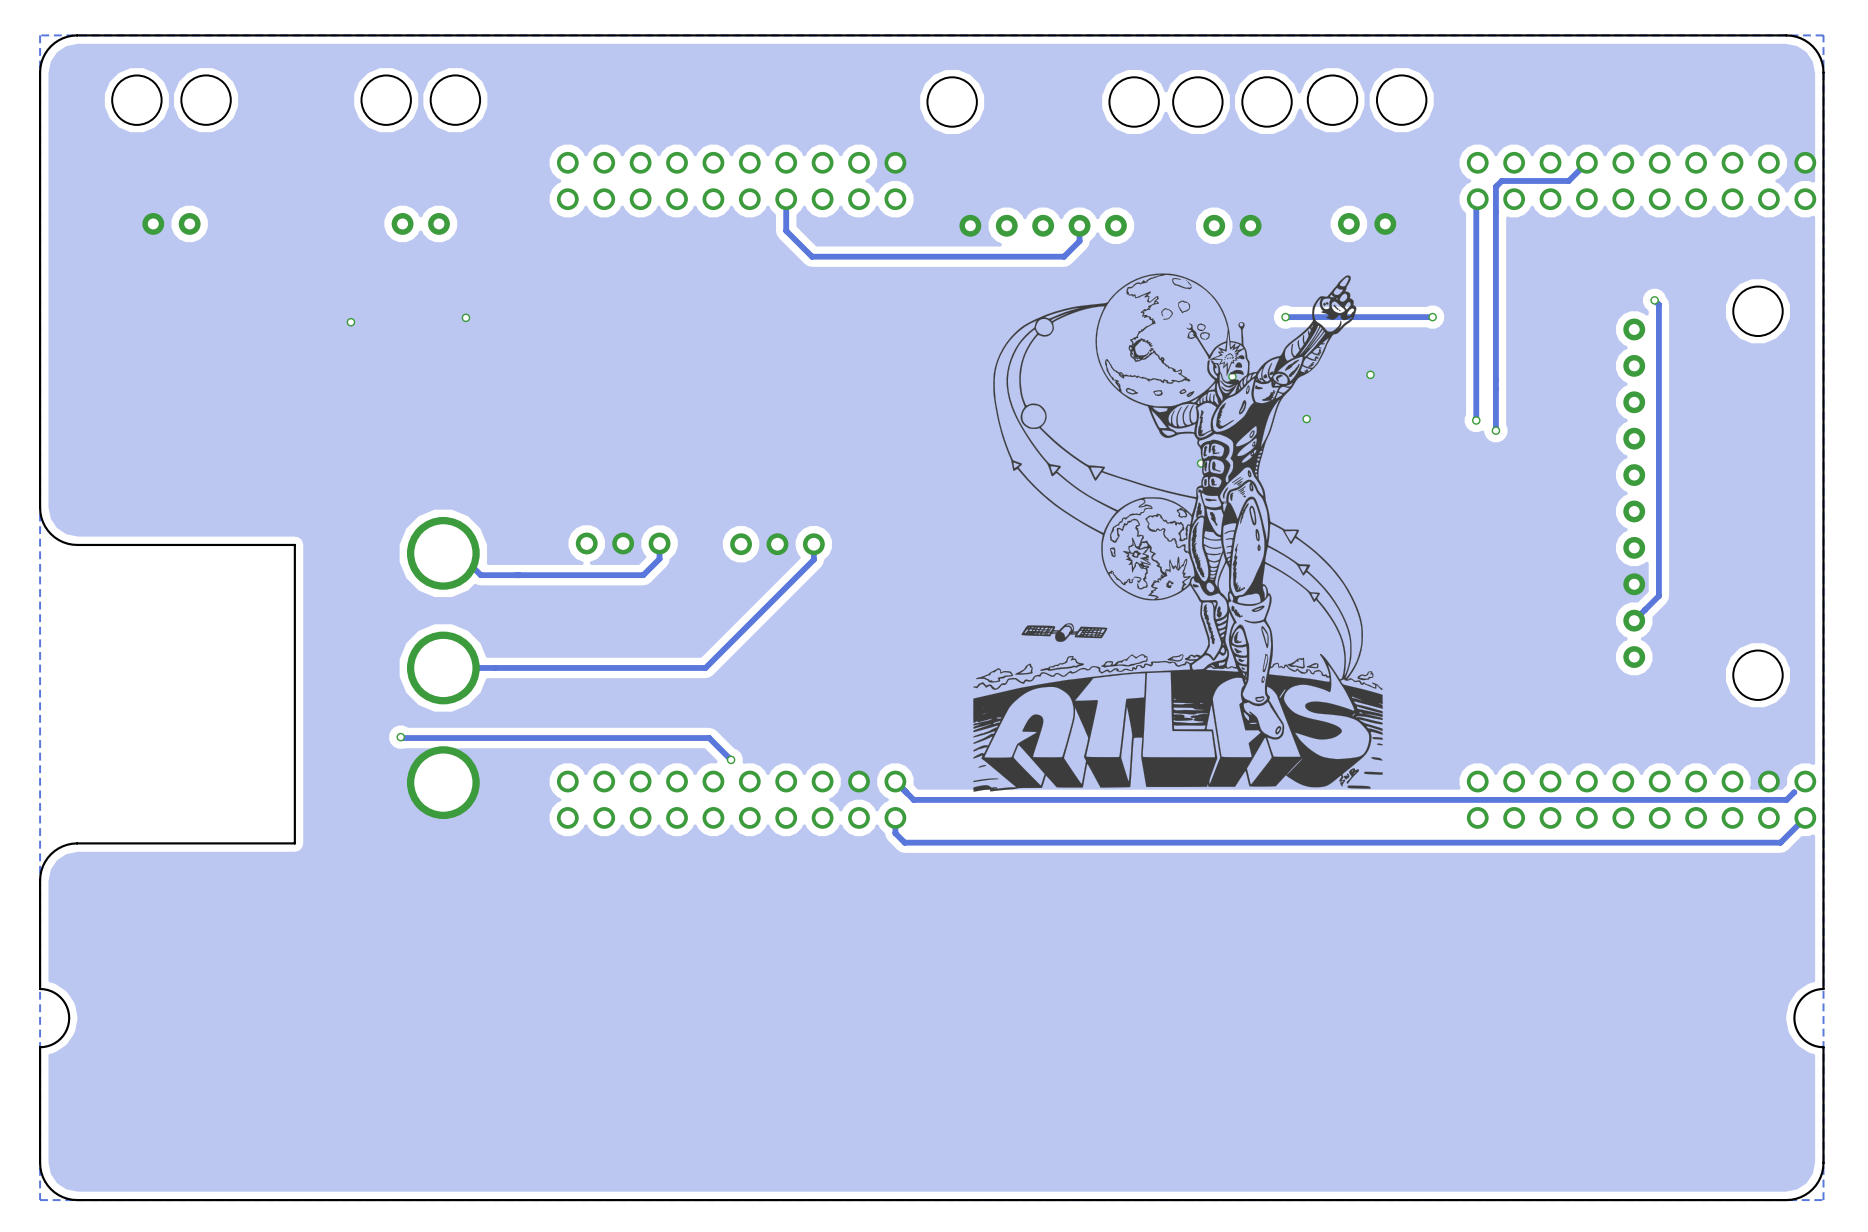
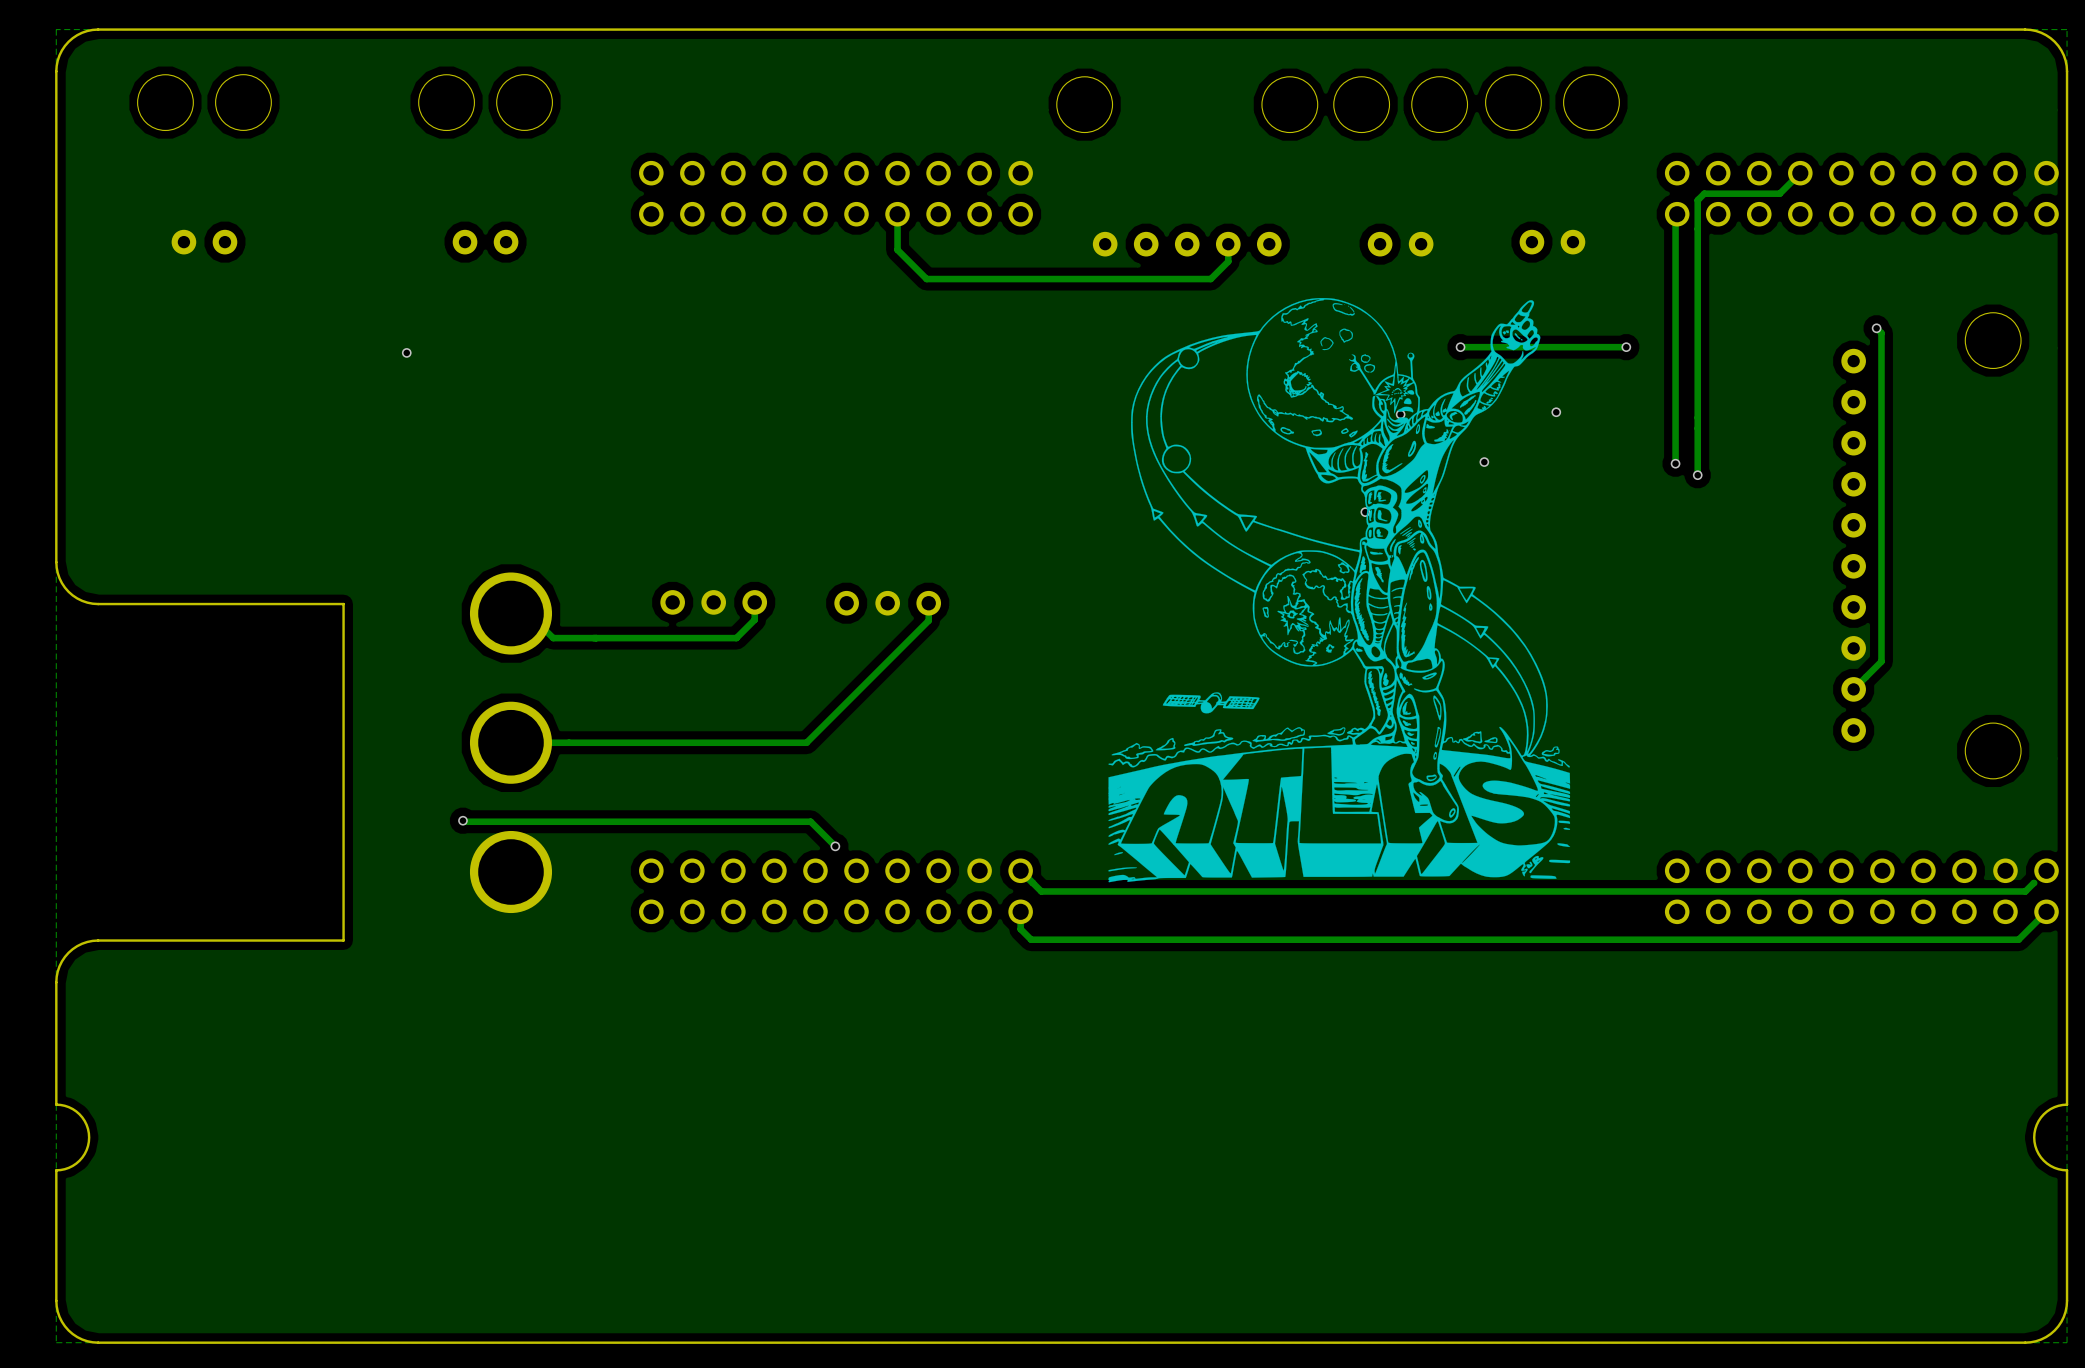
via: (465, 317) -> none

